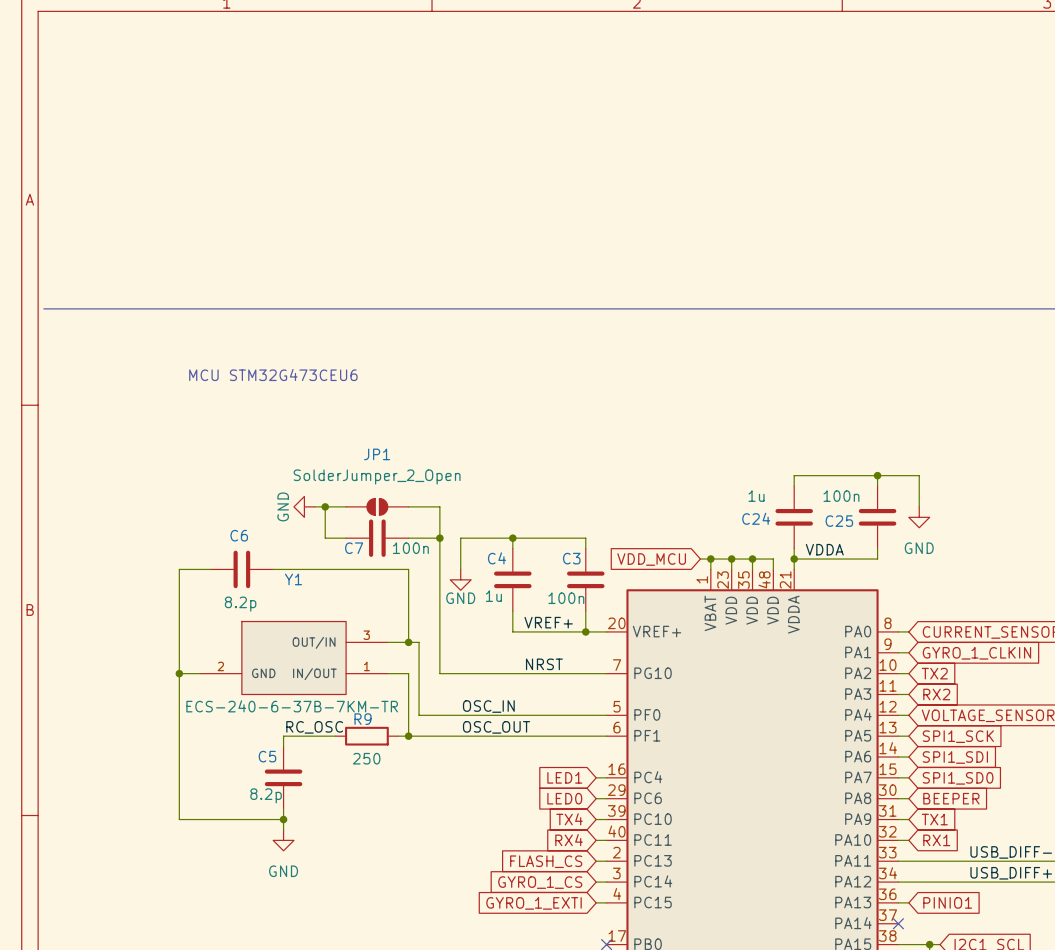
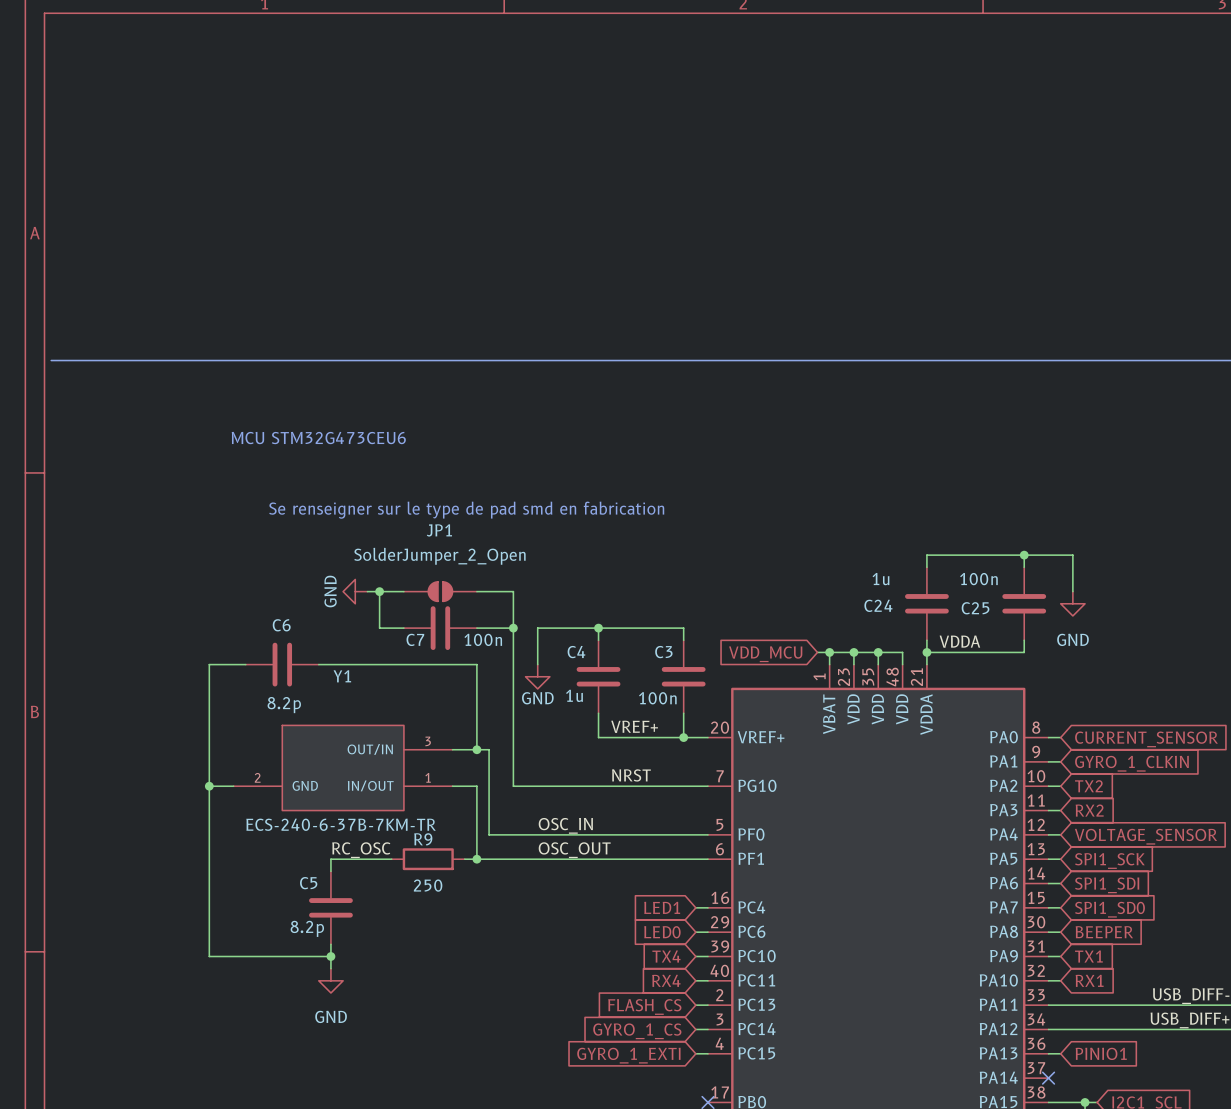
text: none -> Se renseigner sur le type de pad smd en fabrication (466, 510)

